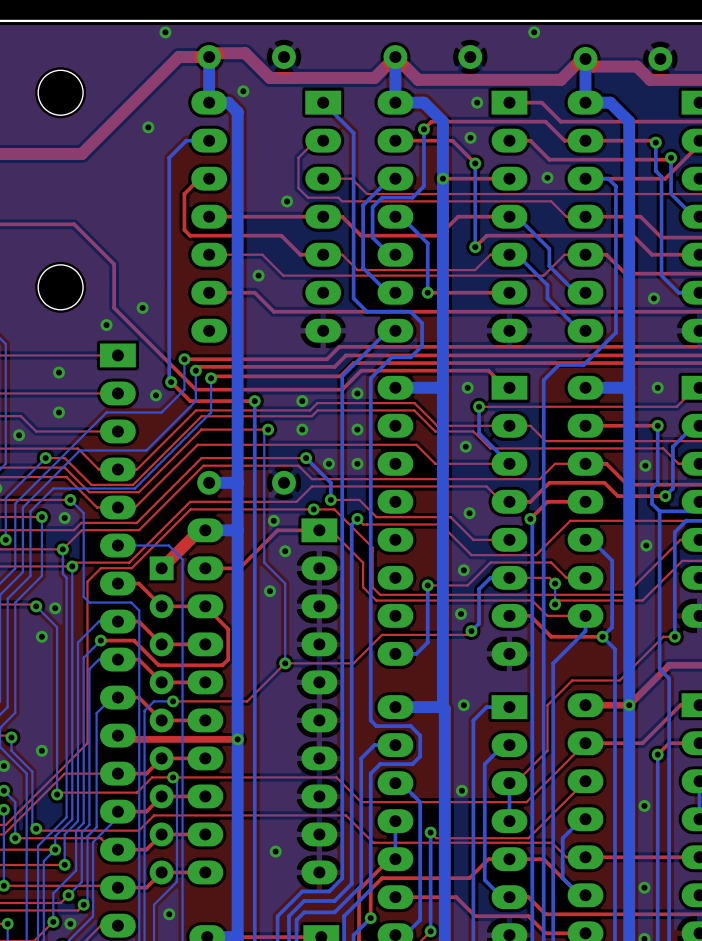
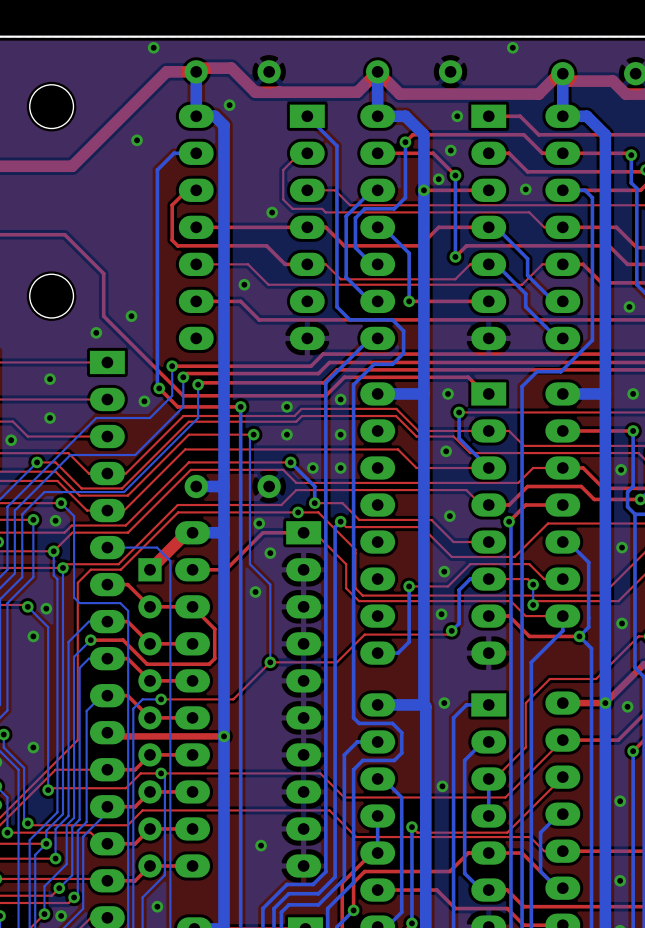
via: none -> (438, 179)
via: none -> (622, 623)
via: none -> (627, 706)

